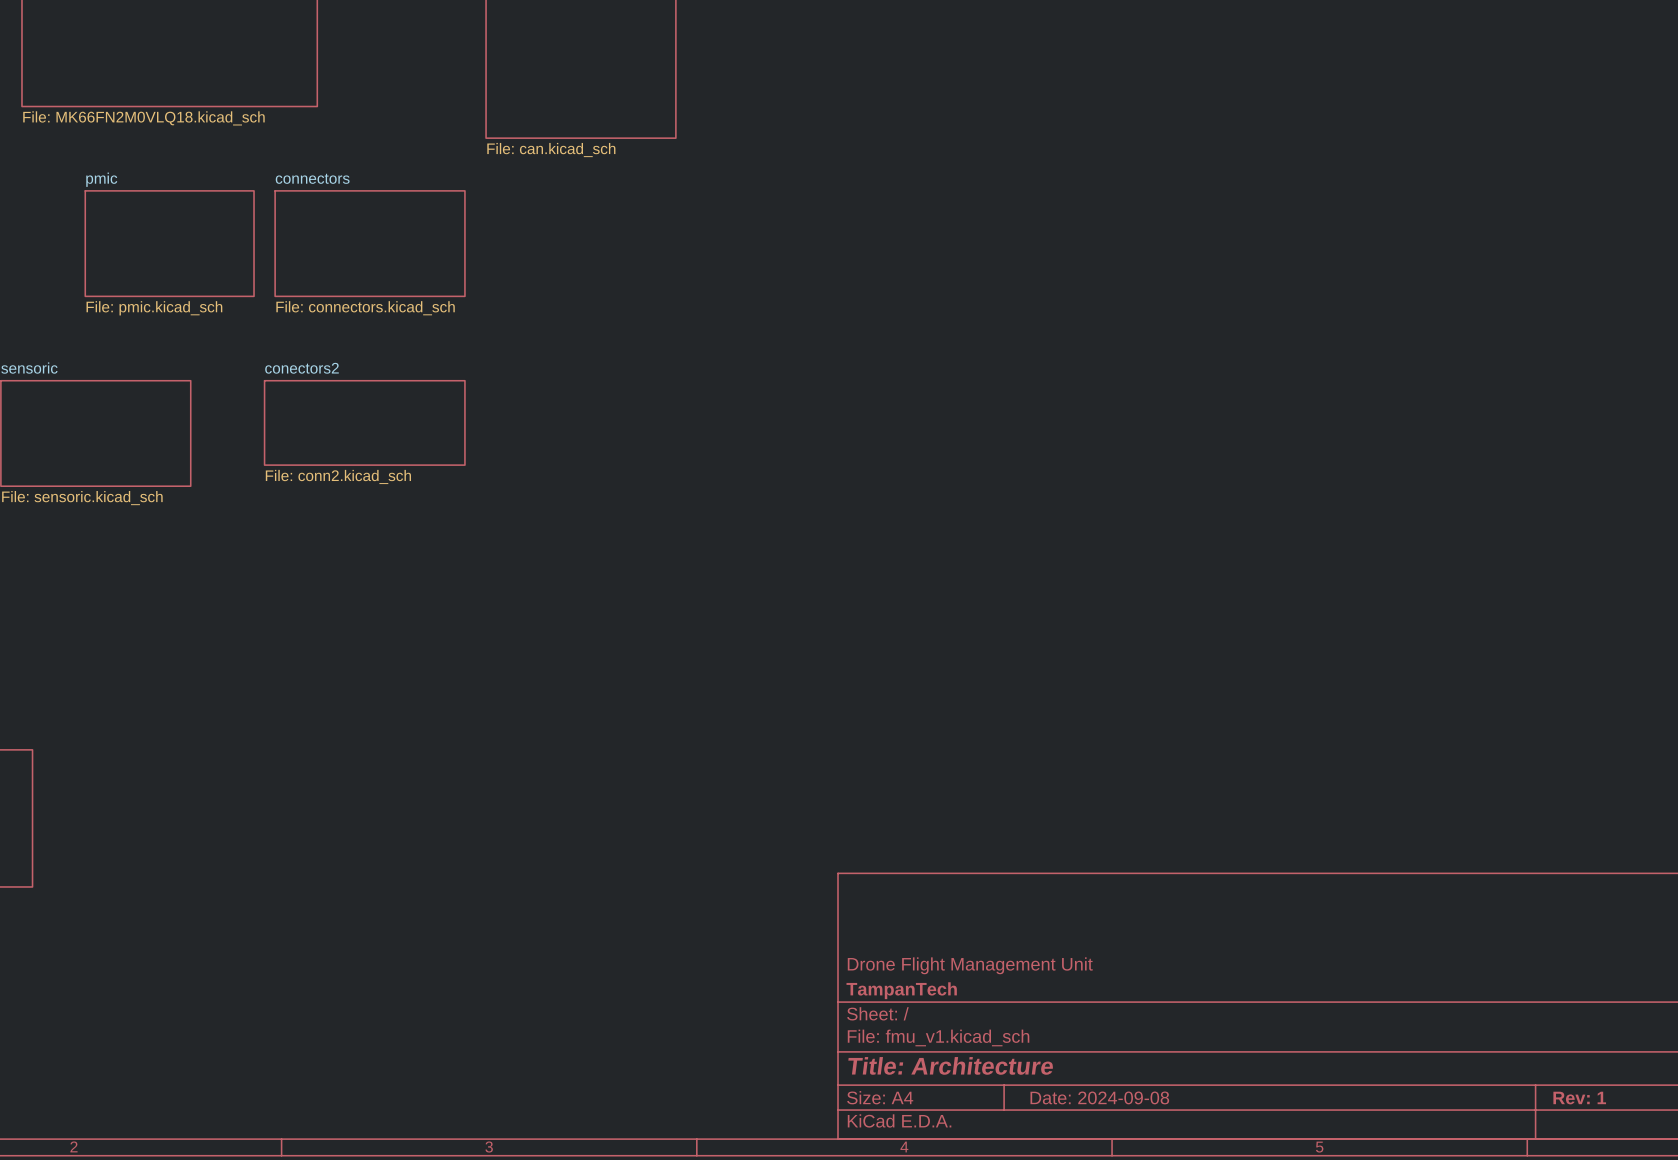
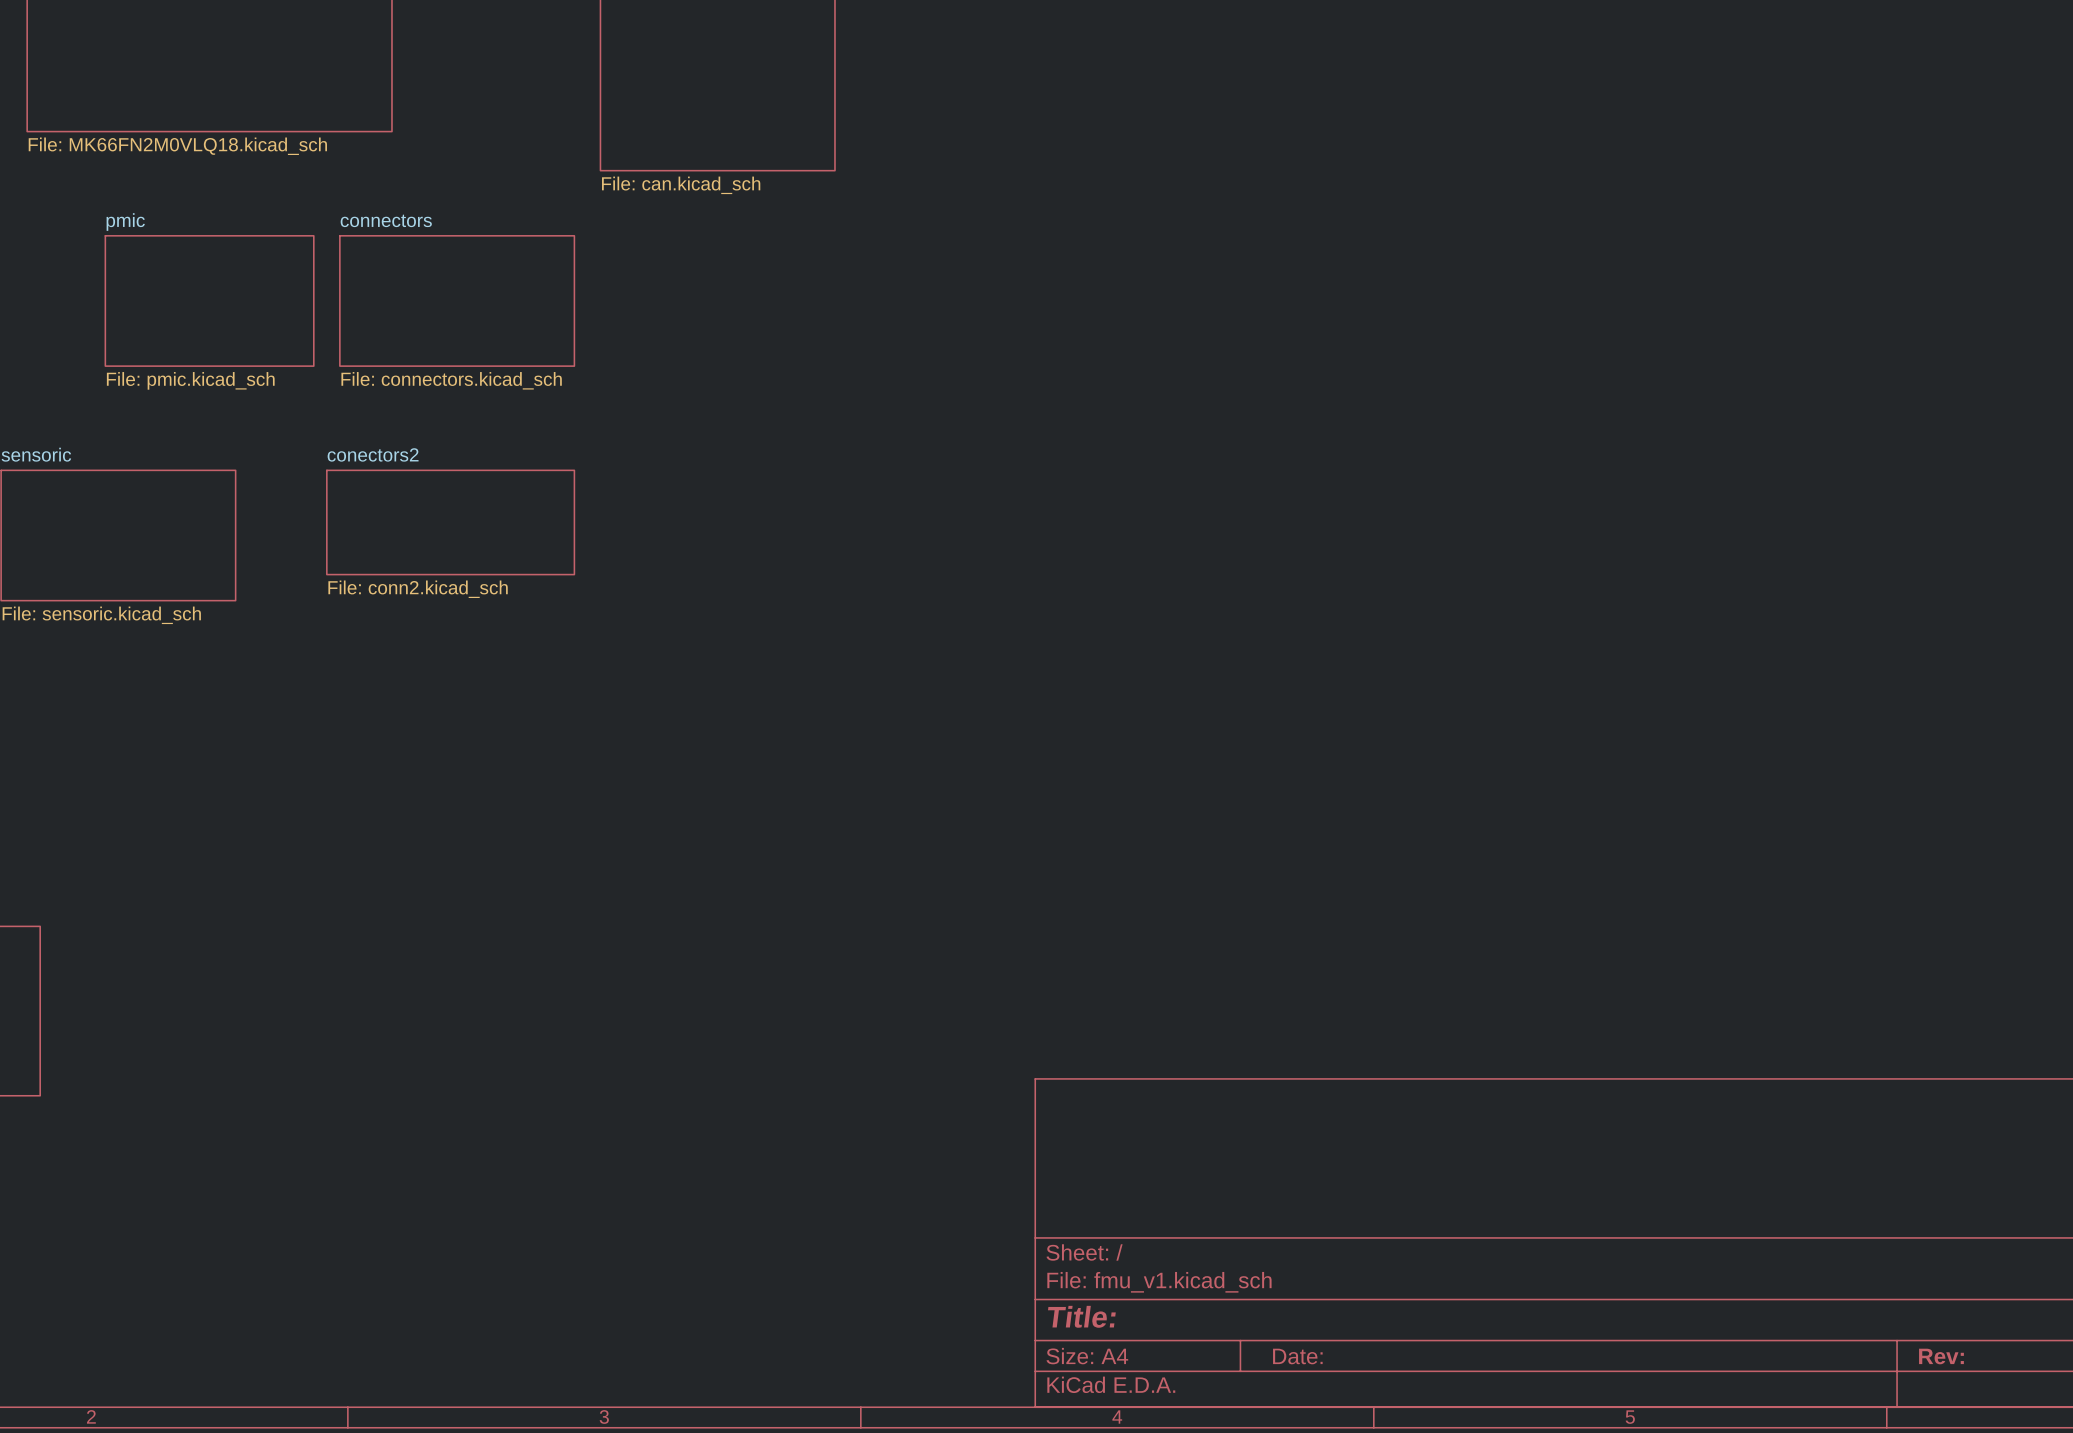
title block: Drone Flight Management Unit (970, 965) -> none
title block: TampanTech (901, 990) -> none
title block: Title: Architecture (950, 1065) -> Title: (1081, 1316)
title block: Date: 2024-09-08 (1099, 1097) -> Date: (1297, 1356)
title block: Rev: 1 (1579, 1098) -> Rev: (1941, 1356)

